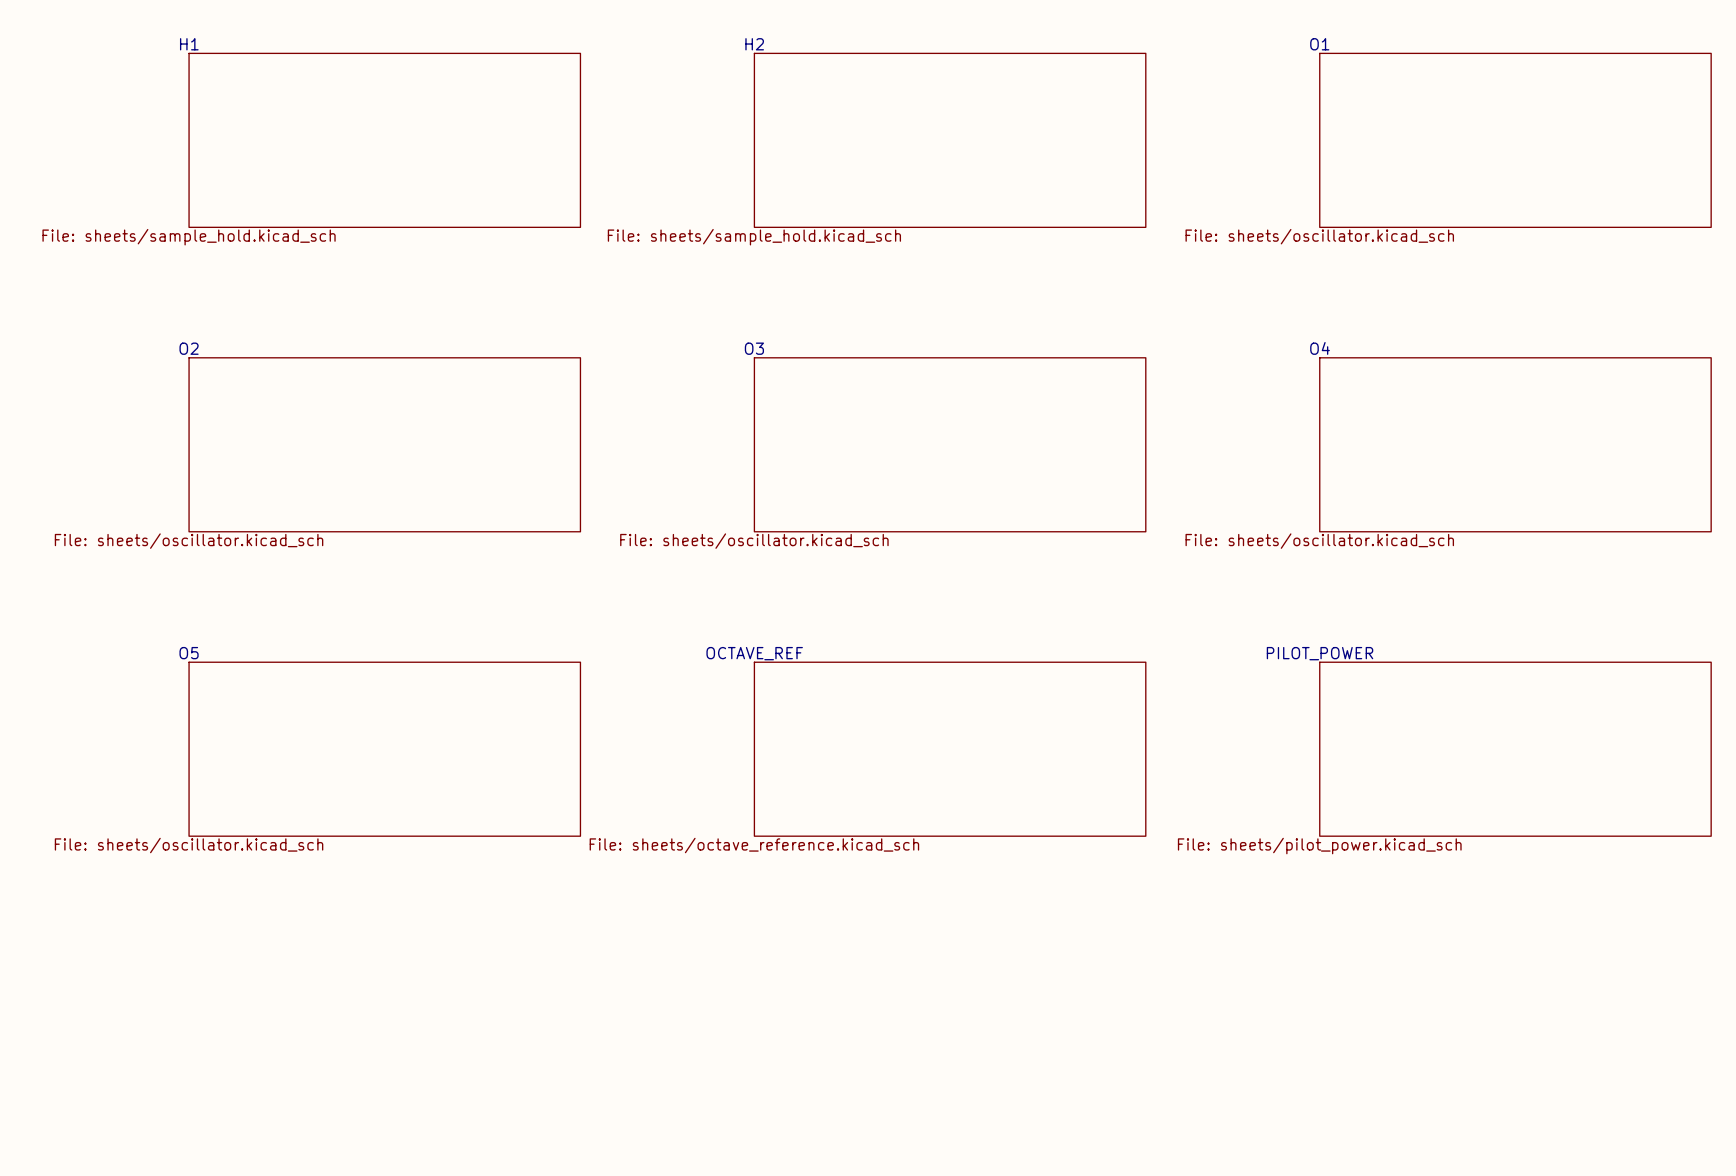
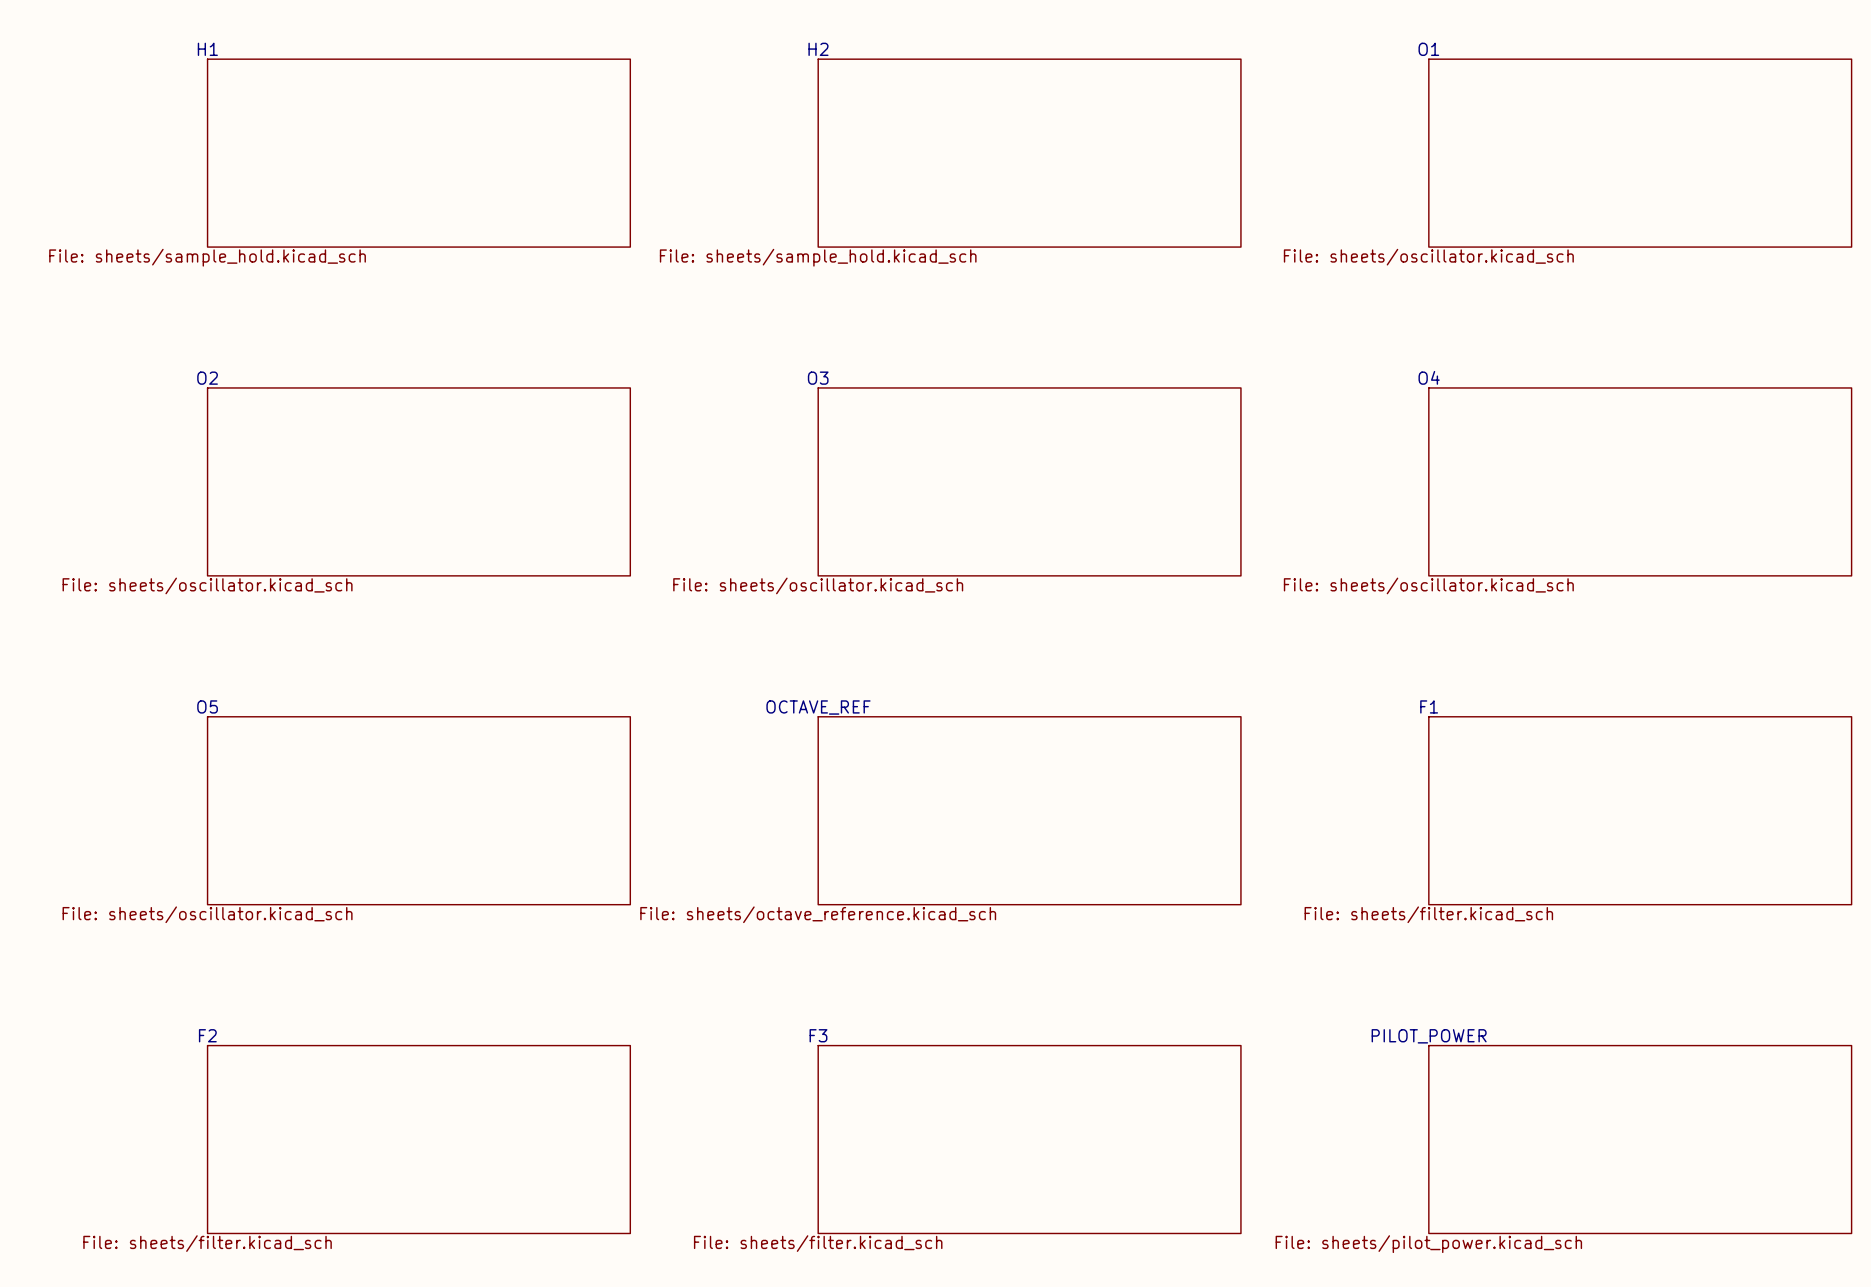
sheet PILOT_POWER name: PILOT_POWER (1320, 653) -> F1 (1429, 706)
sheet PILOT_POWER value: File: sheets/pilot_power.kicad_sch (1319, 846) -> File: sheets/filter.kicad_sch (1428, 914)
sheet F2: none -> File: sheets/filter.kicad_sch (418, 1139)
sheet F3: none -> File: sheets/filter.kicad_sch (1029, 1139)
sheet PILOT_POWER: none -> File: sheets/pilot_power.kicad_sch (1640, 1139)

